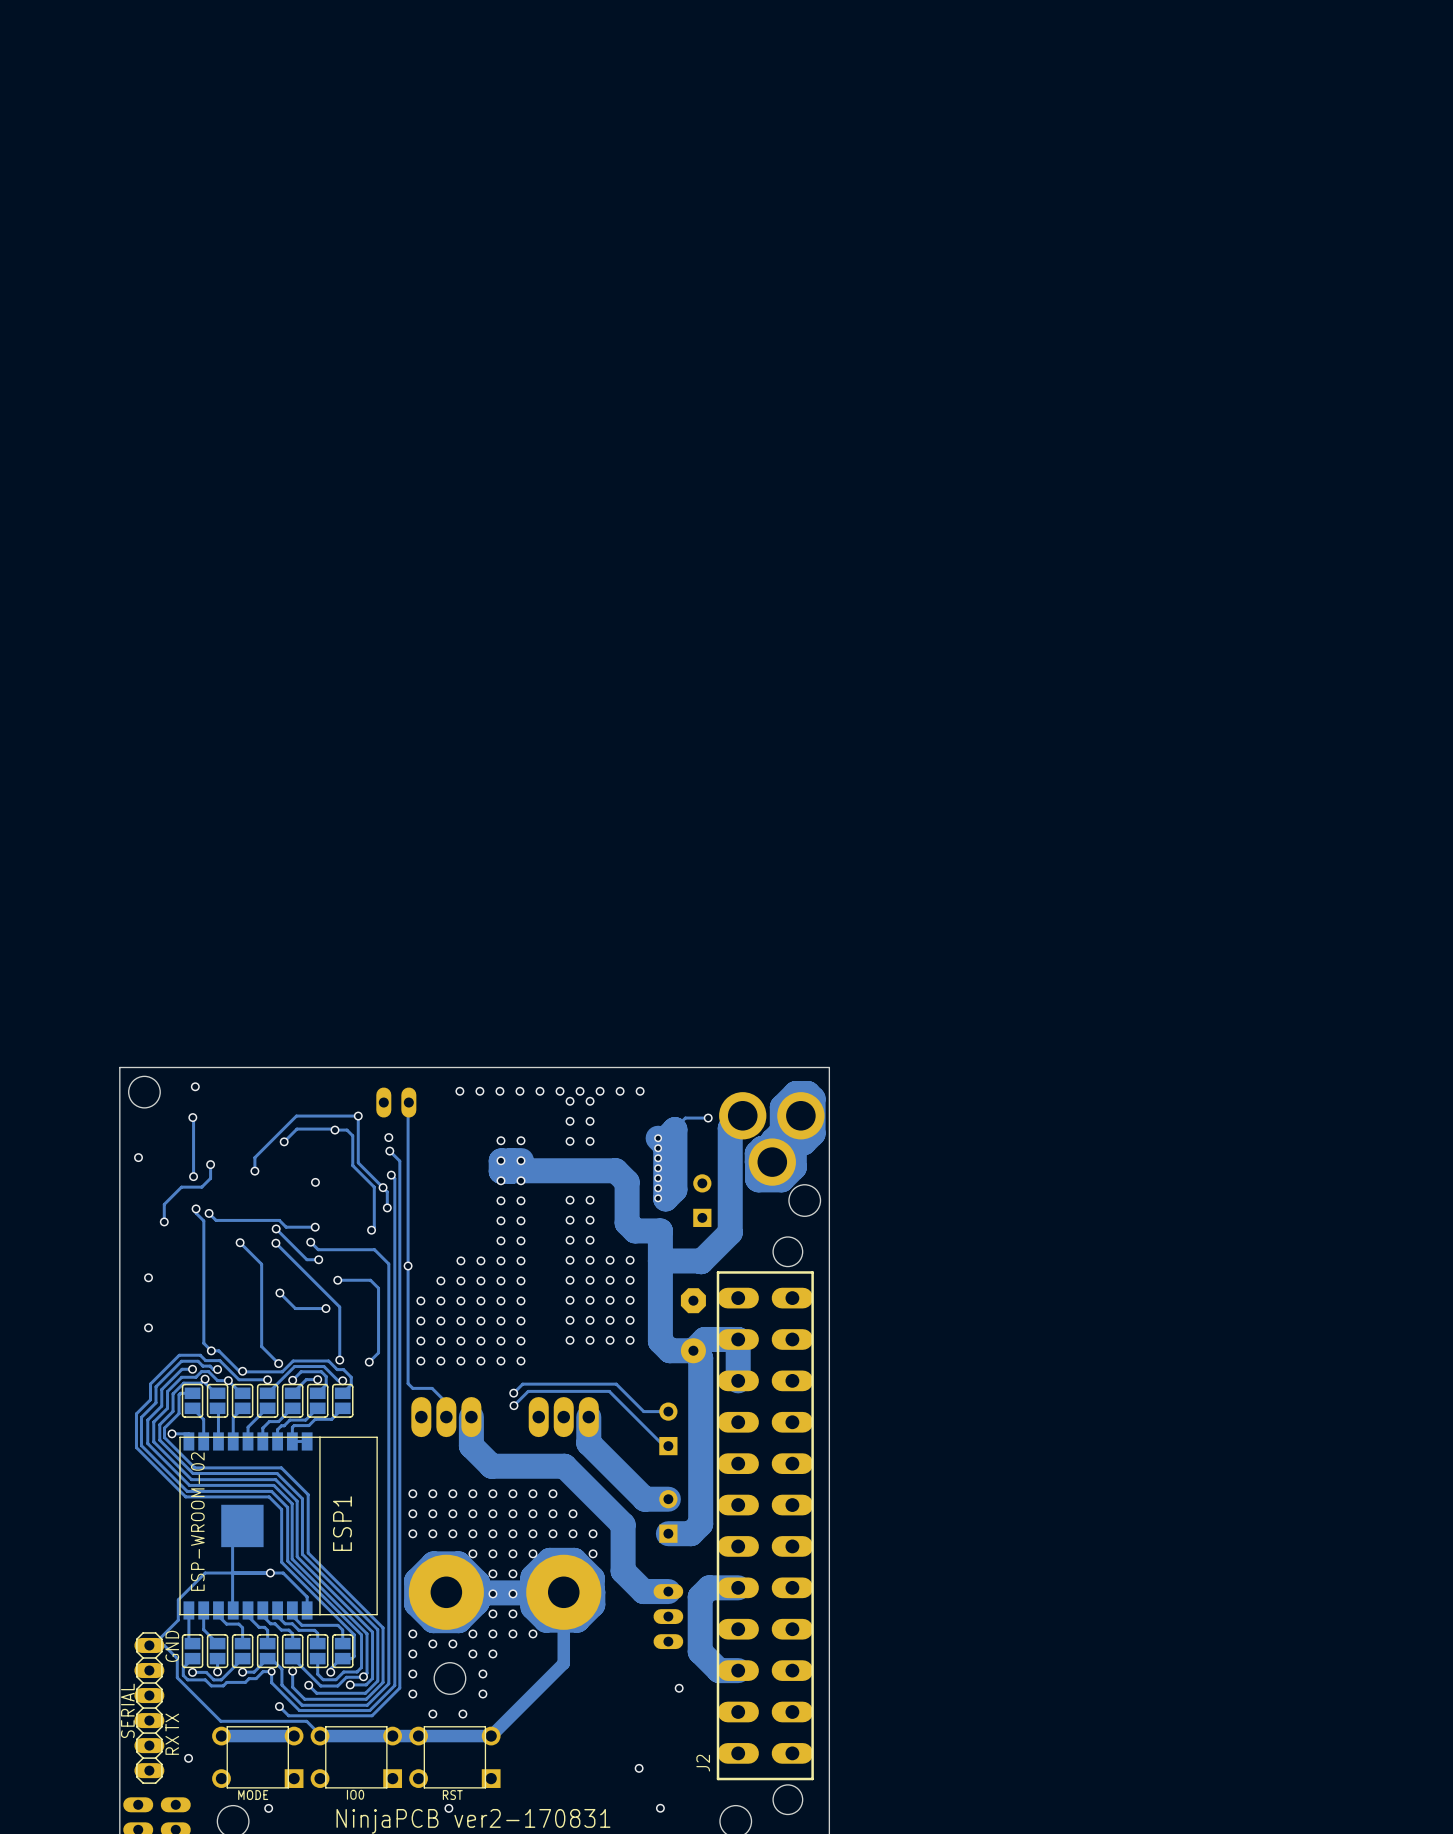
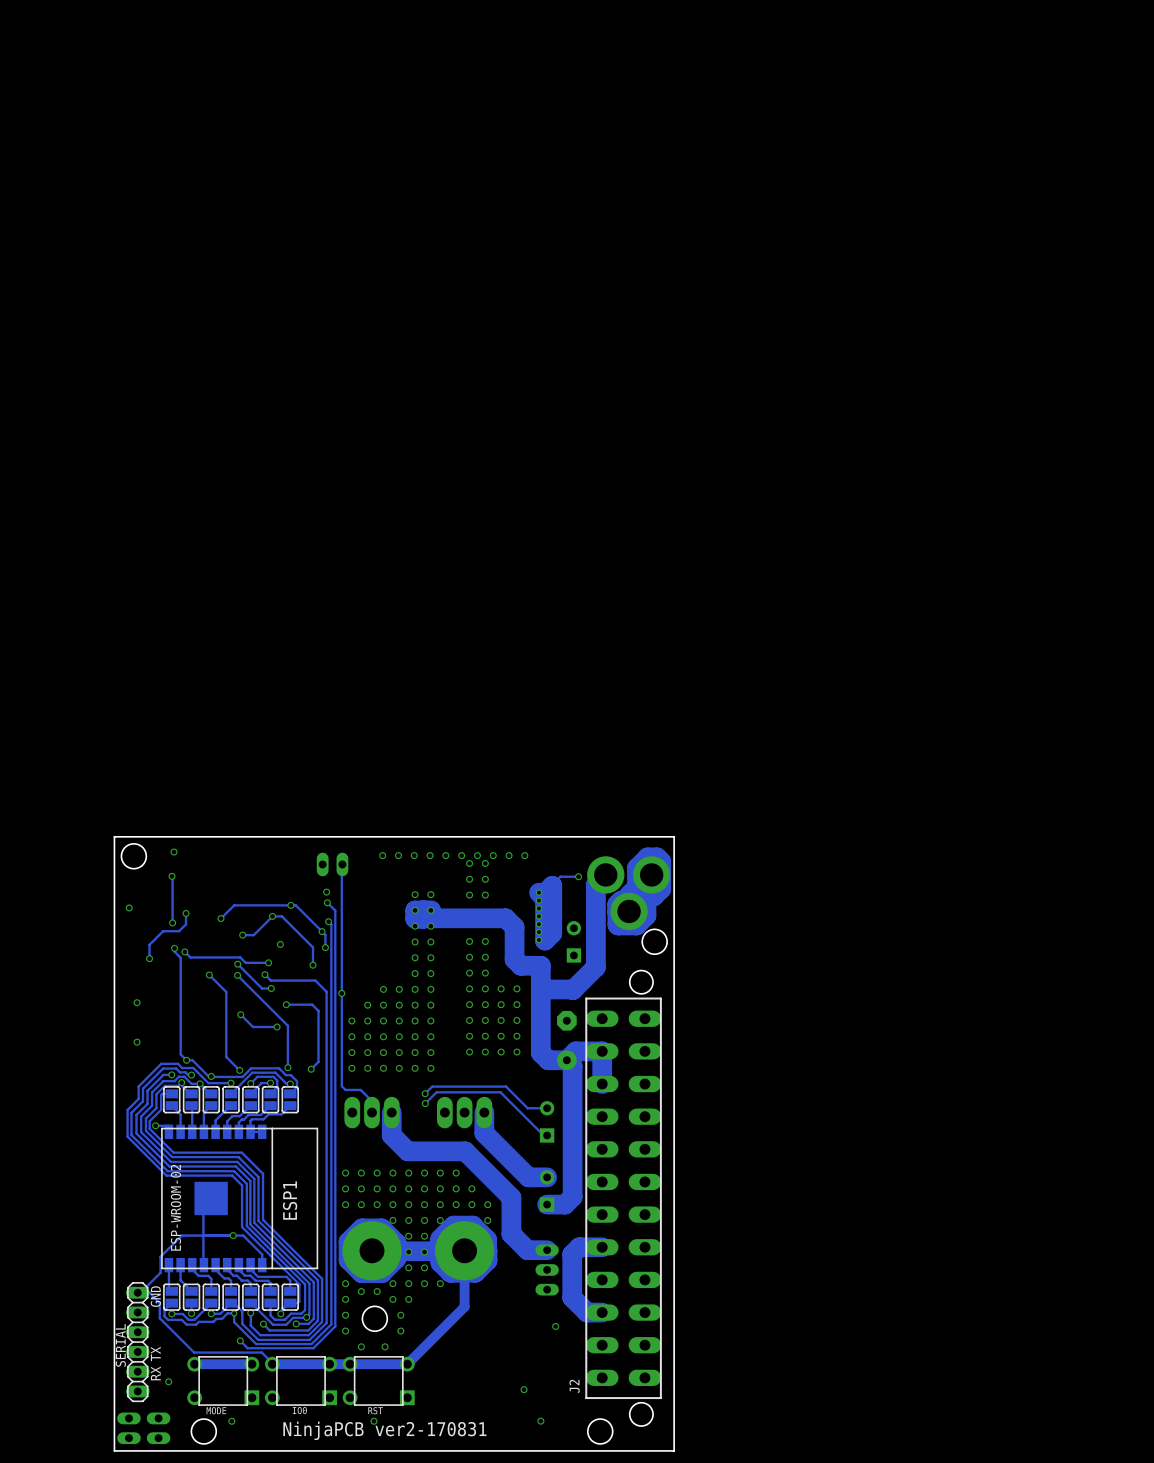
via: (358, 1116) -> none
via: (334, 1130) -> none
track: (284, 1141) (296, 1129) (347, 1130) (352, 1135) (352, 1165) (374, 1187) (374, 1227) (371, 1230) -> (242, 935) (253, 935) (272, 916) (281, 916) (312, 947) (312, 965)
via: (284, 1141) -> none
via: none -> (290, 905)
track: (358, 1162) (358, 1116) (296, 1116) (254, 1157) (254, 1171) -> (302, 912) (295, 905) (234, 905) (220, 918)
via: none -> (272, 916)
via: (315, 1182) -> none
via: none -> (242, 935)
via: none -> (280, 944)

